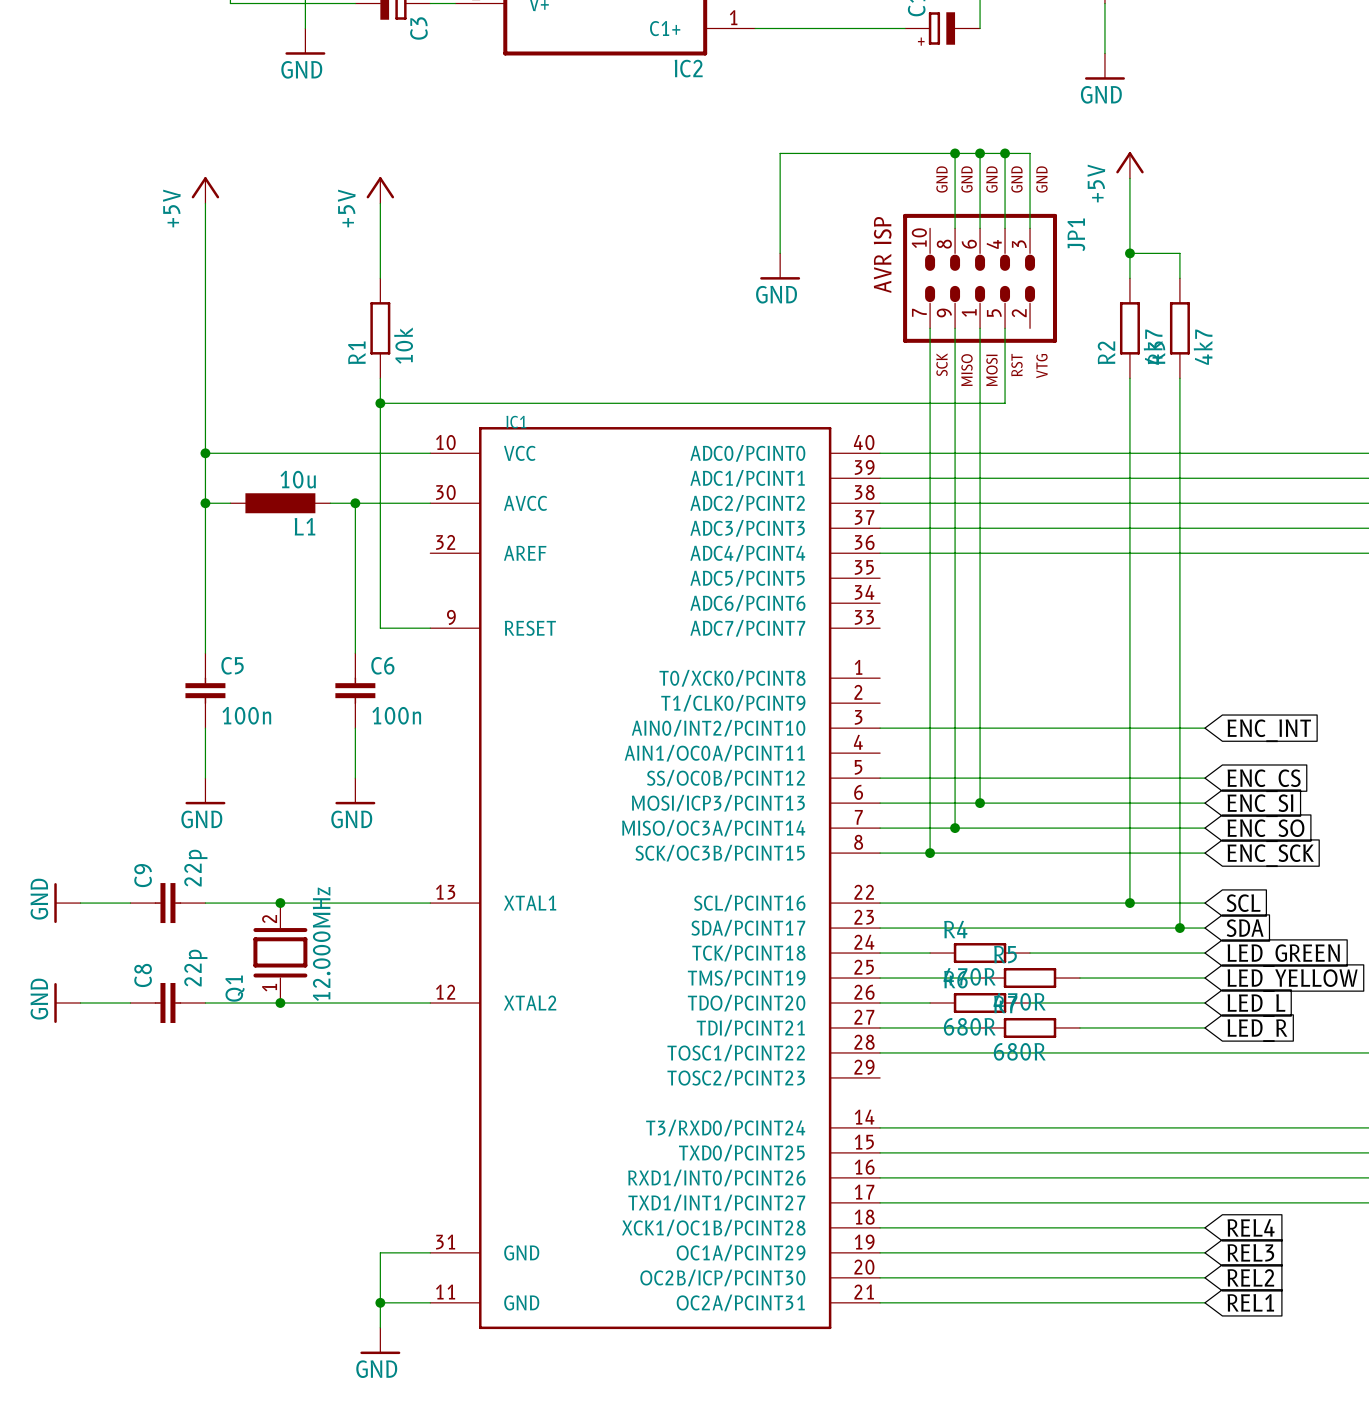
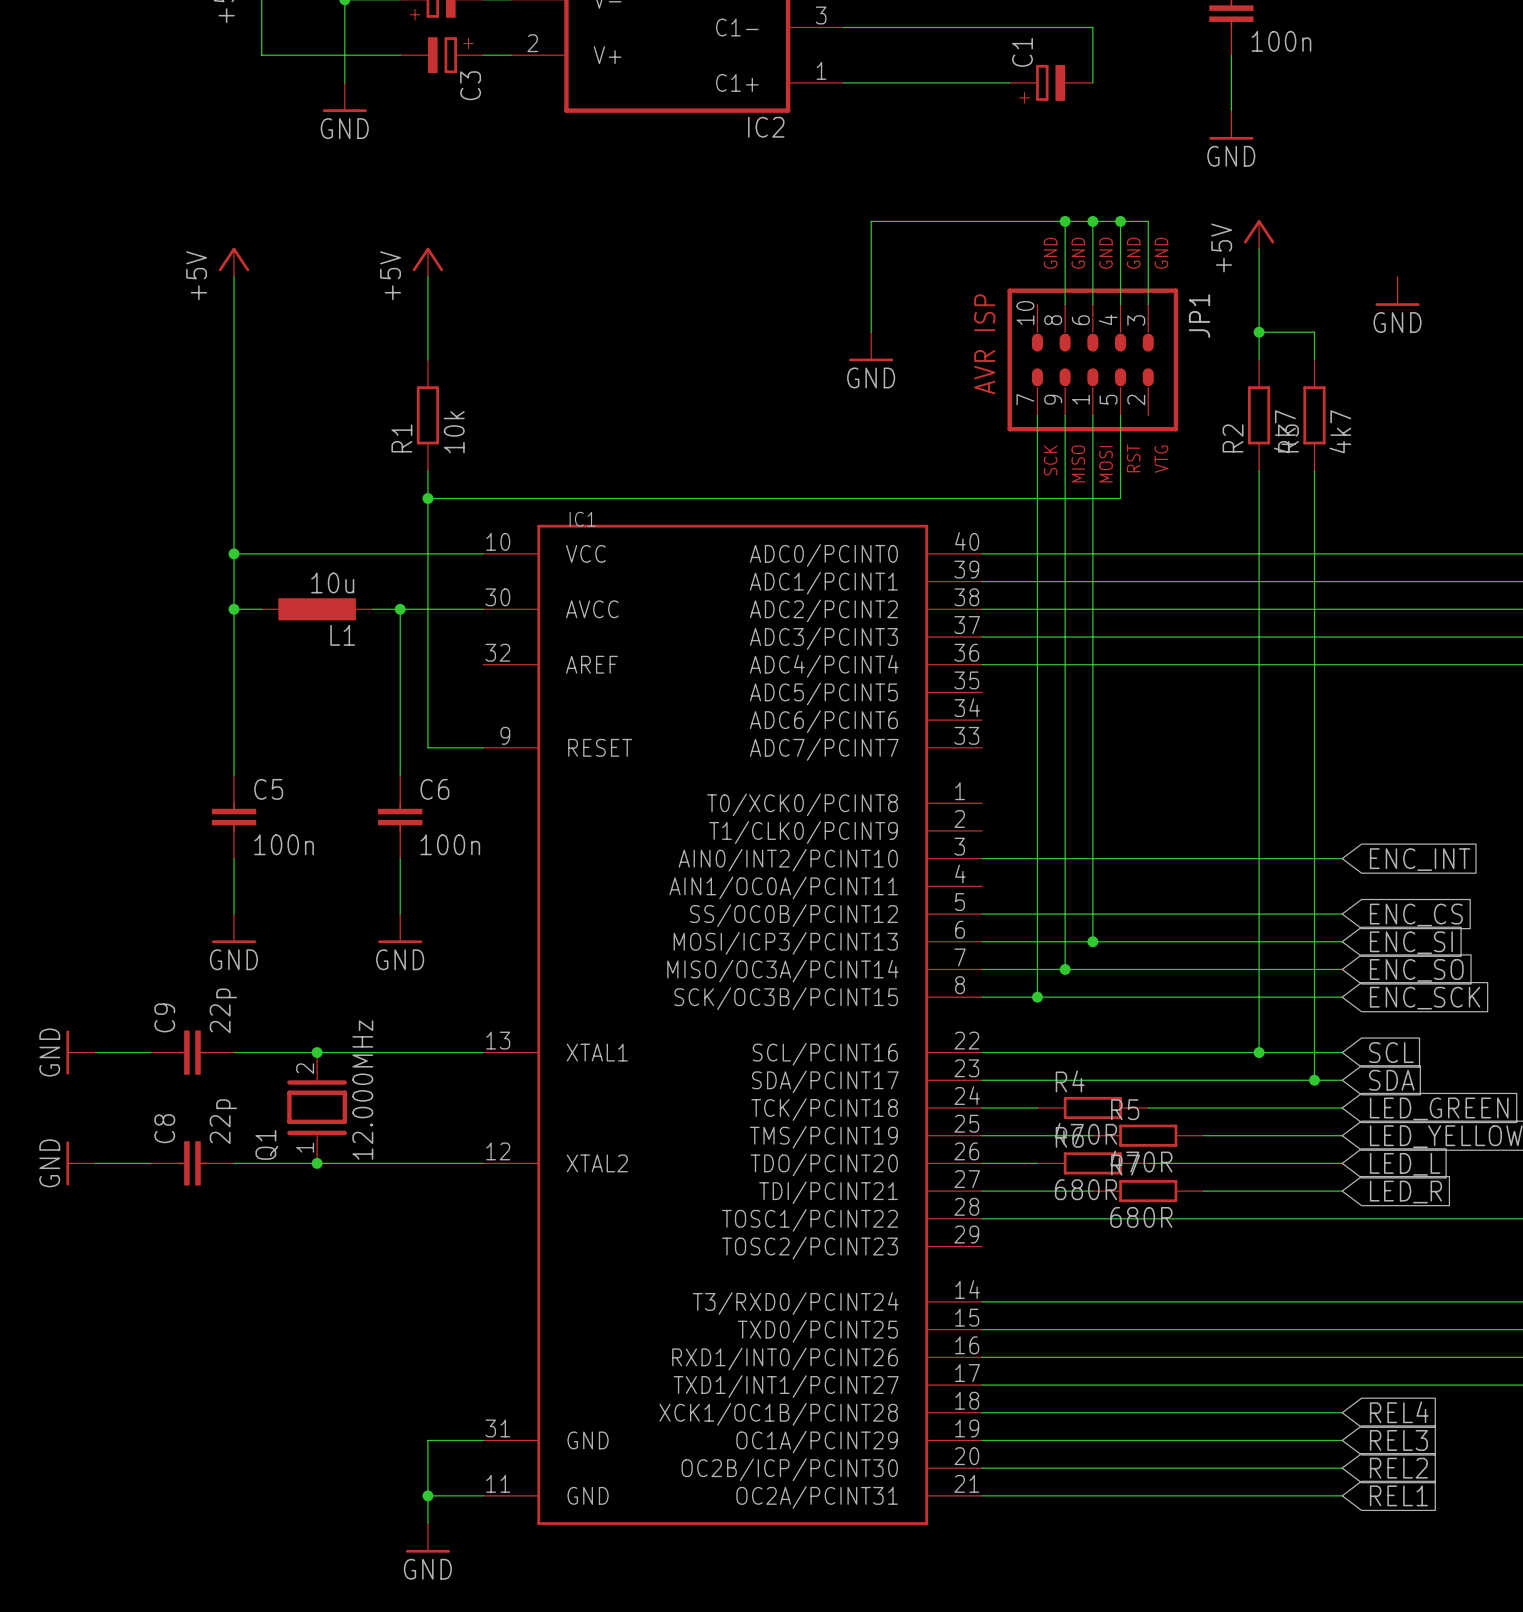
power symbol: none -> GND (1397, 291)

